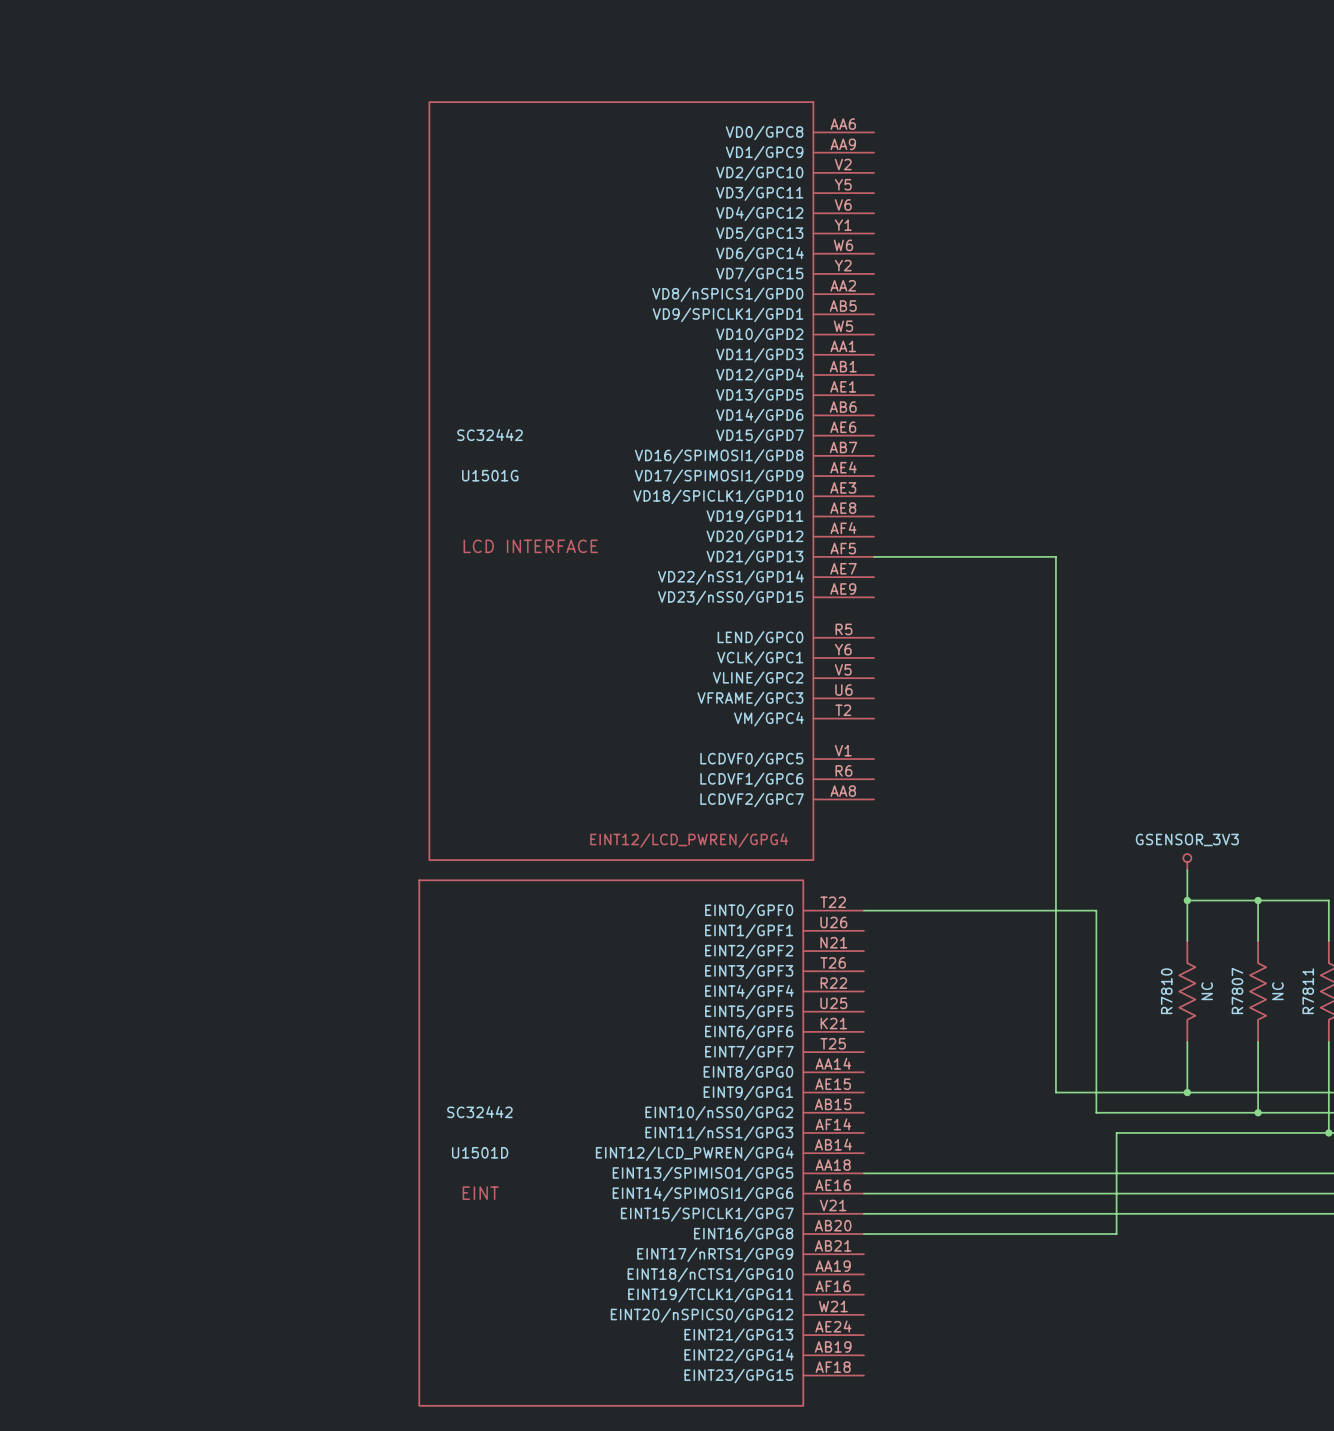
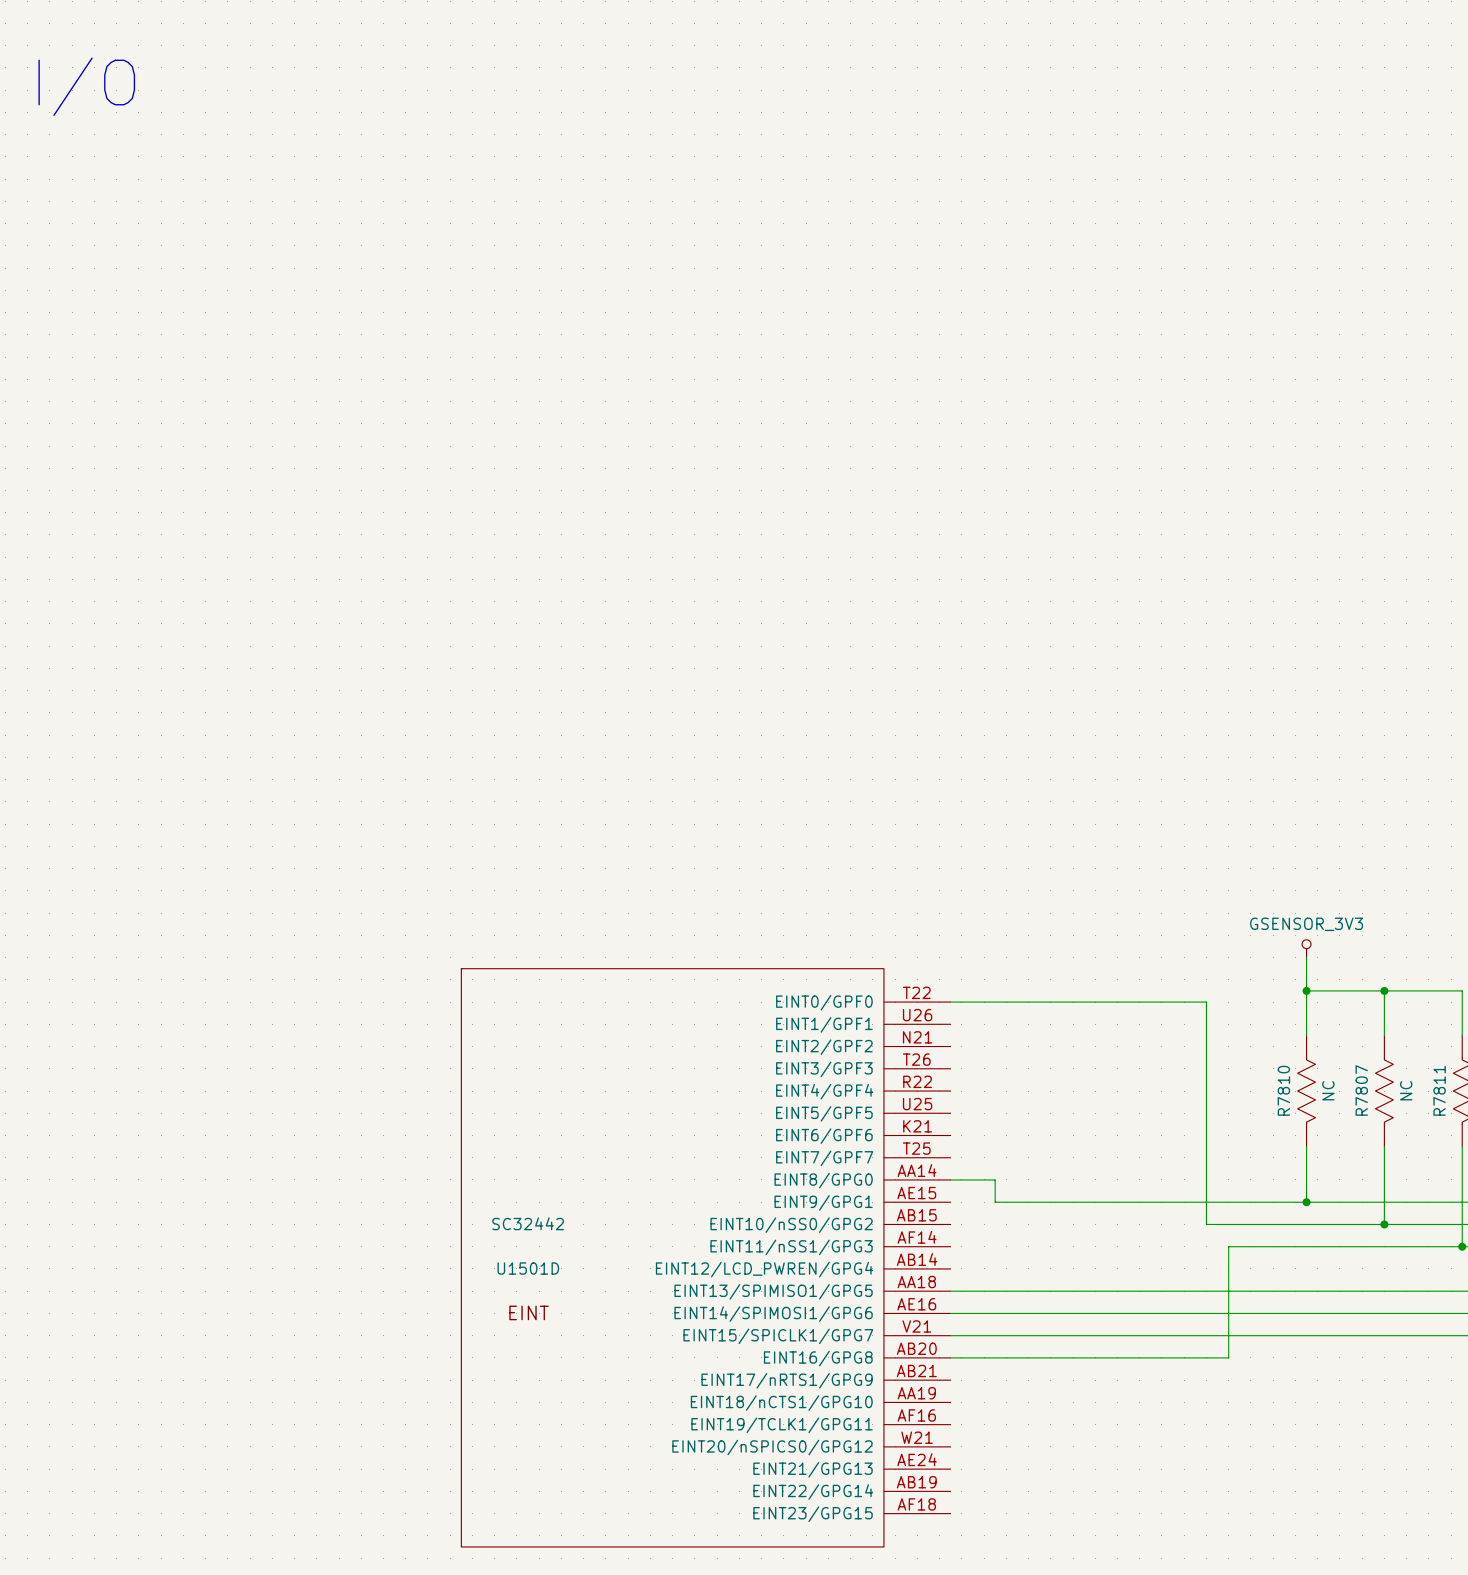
text: none -> I/O (86, 86)
U1501G: SC32442 (651, 481) -> none
wire: (874, 556) (1055, 556) (1055, 1092) -> (950, 1179) (995, 1179) (995, 1202) (1161, 1202)

